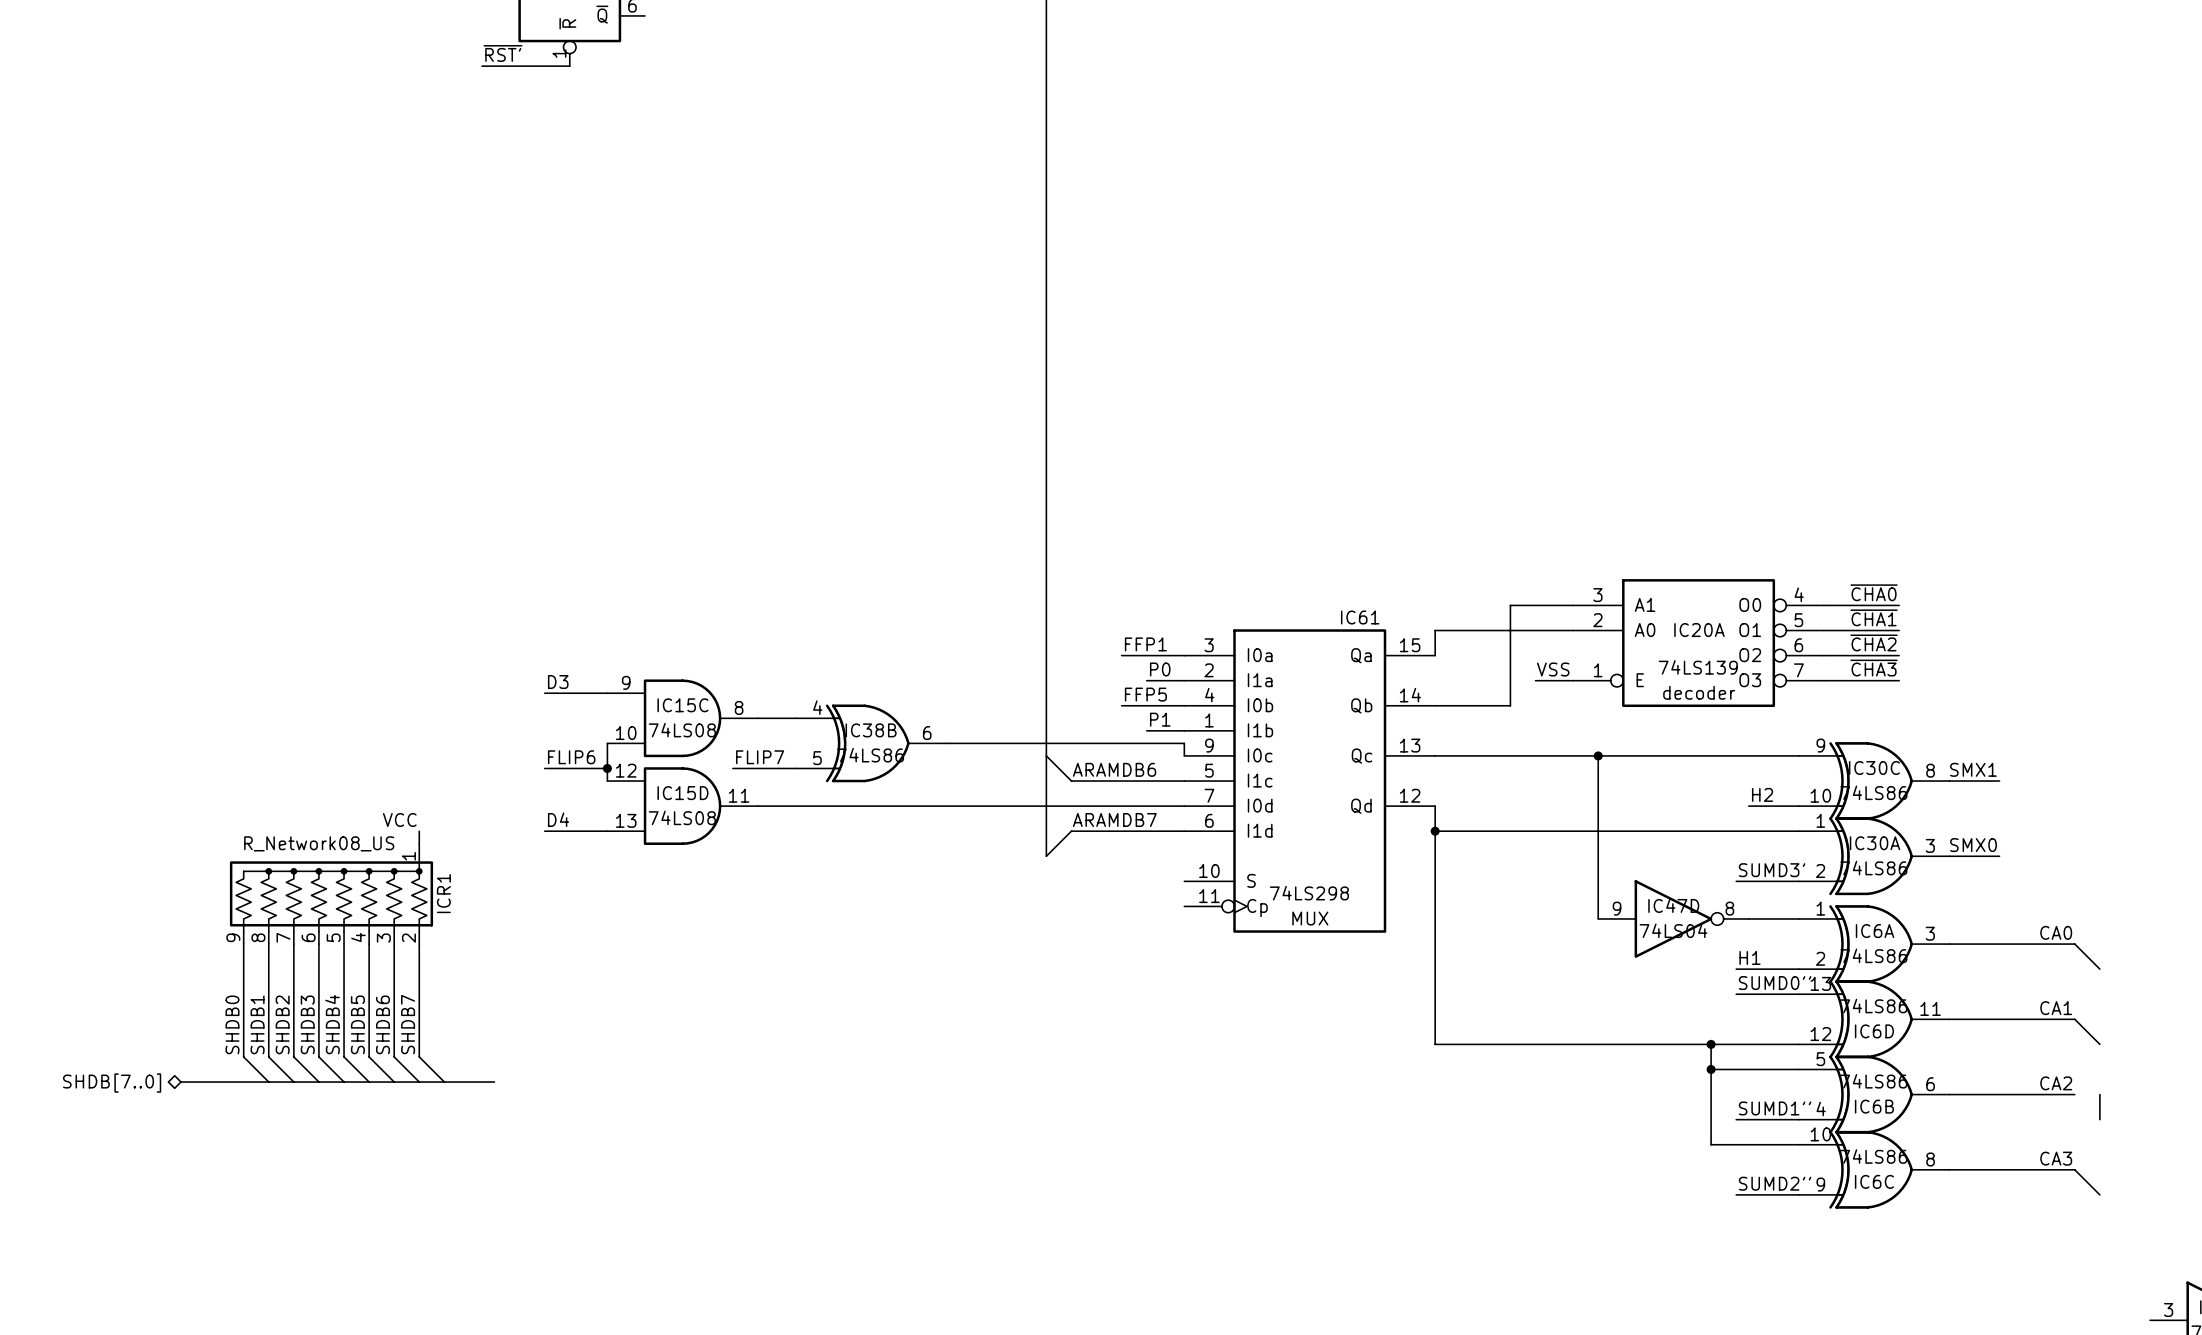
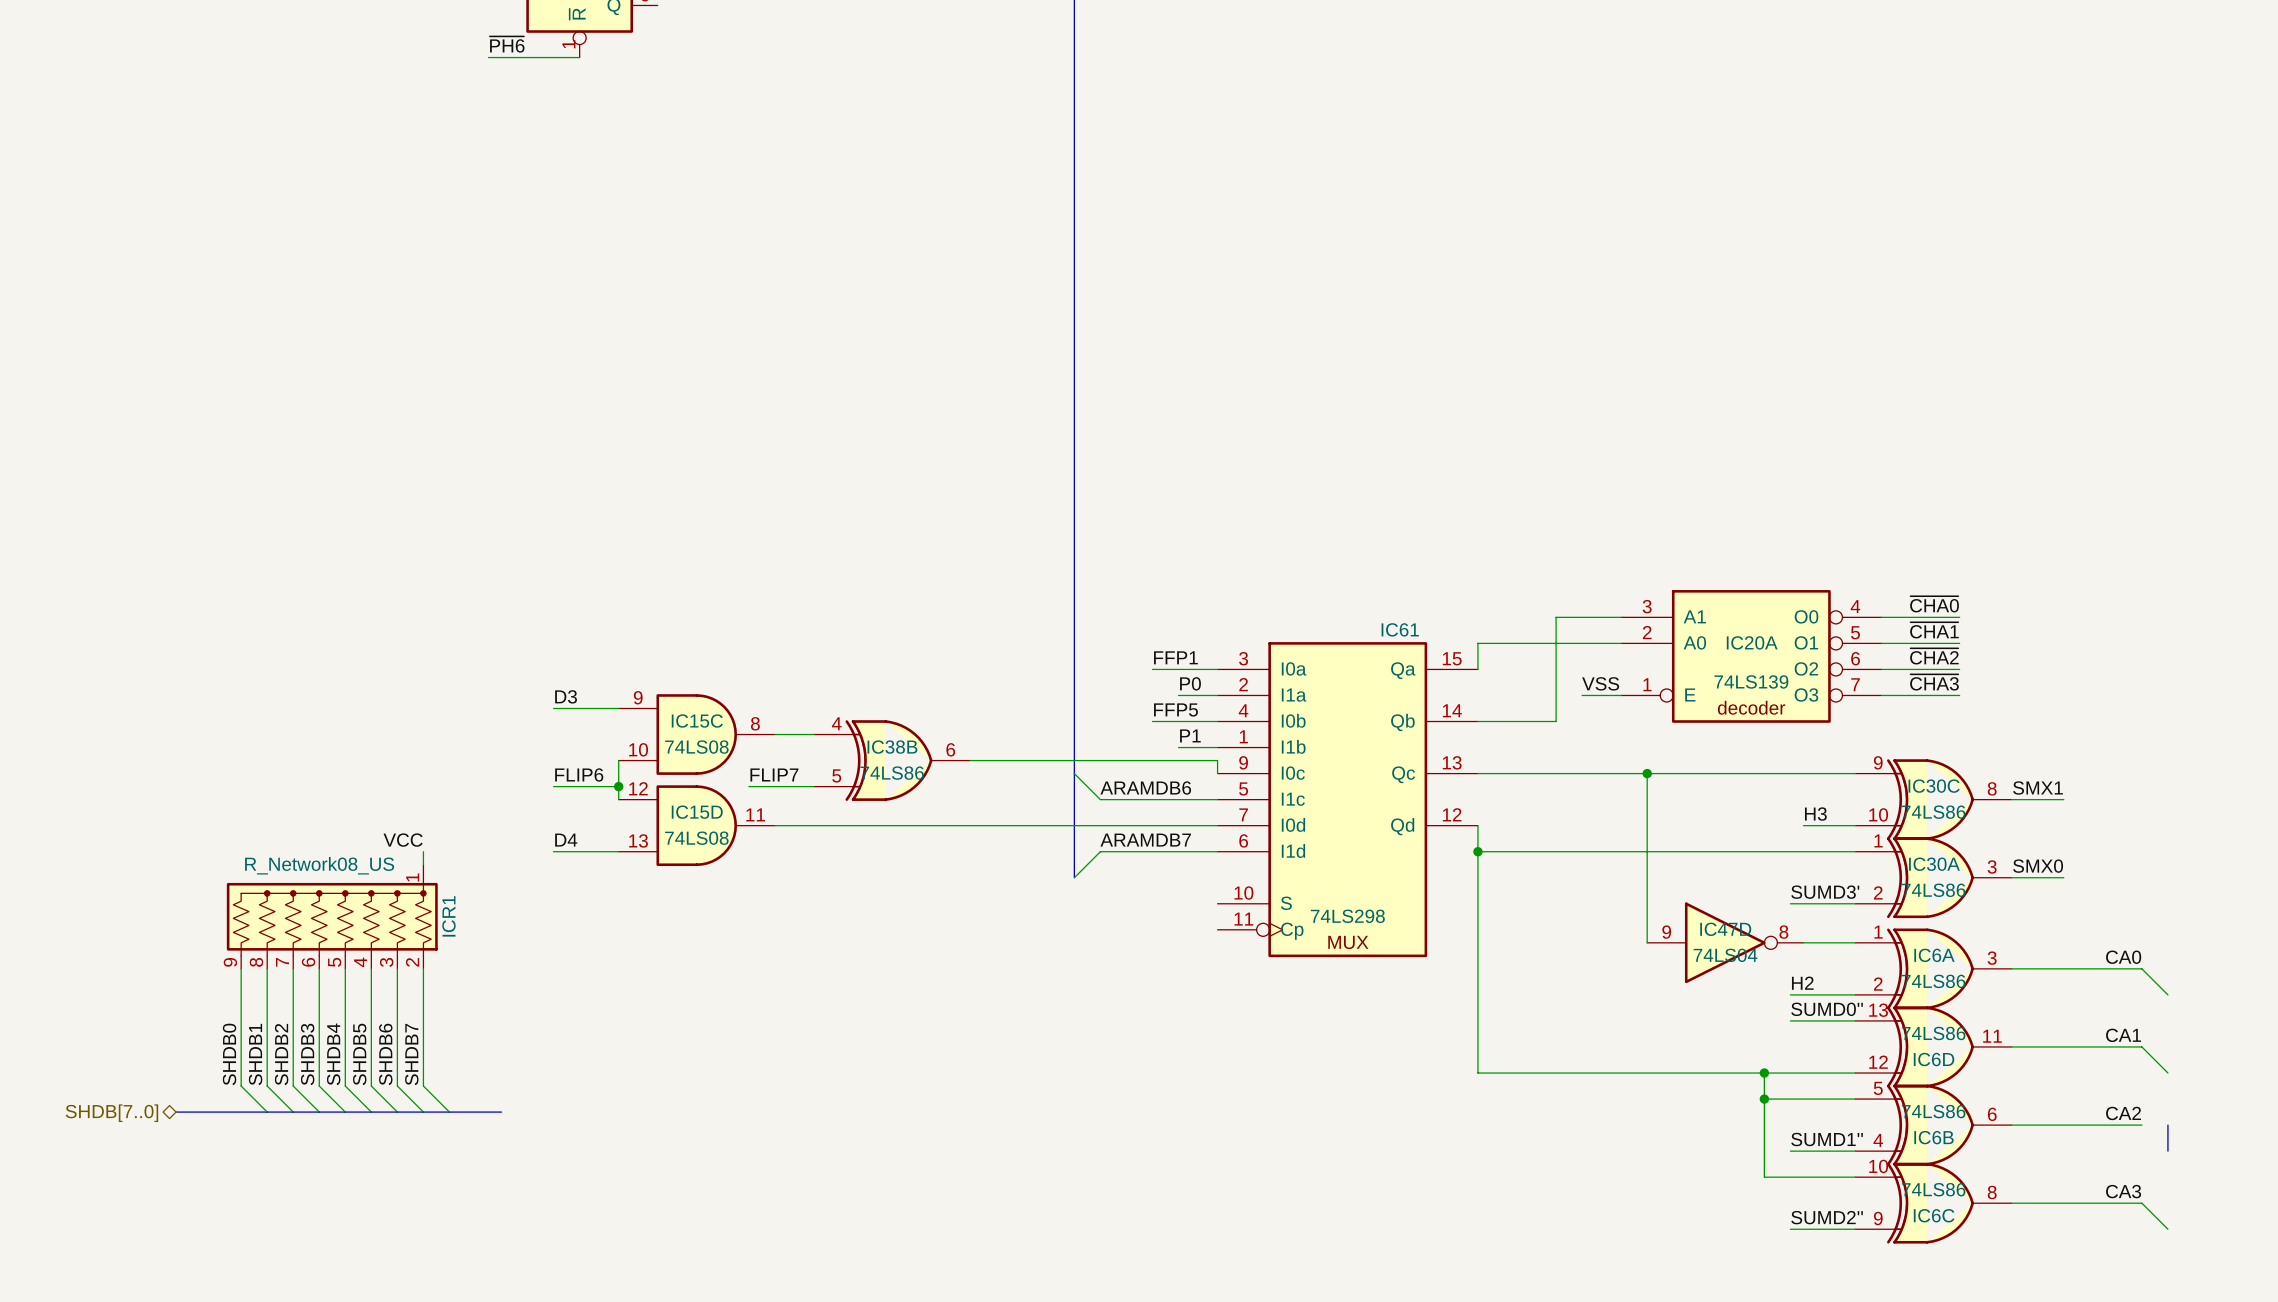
label: ~{RST'} (502, 53) -> ~{PH6} (507, 44)
label: H2 (1762, 794) -> H3 (1815, 814)
label: H1 (1750, 957) -> H2 (1802, 983)

